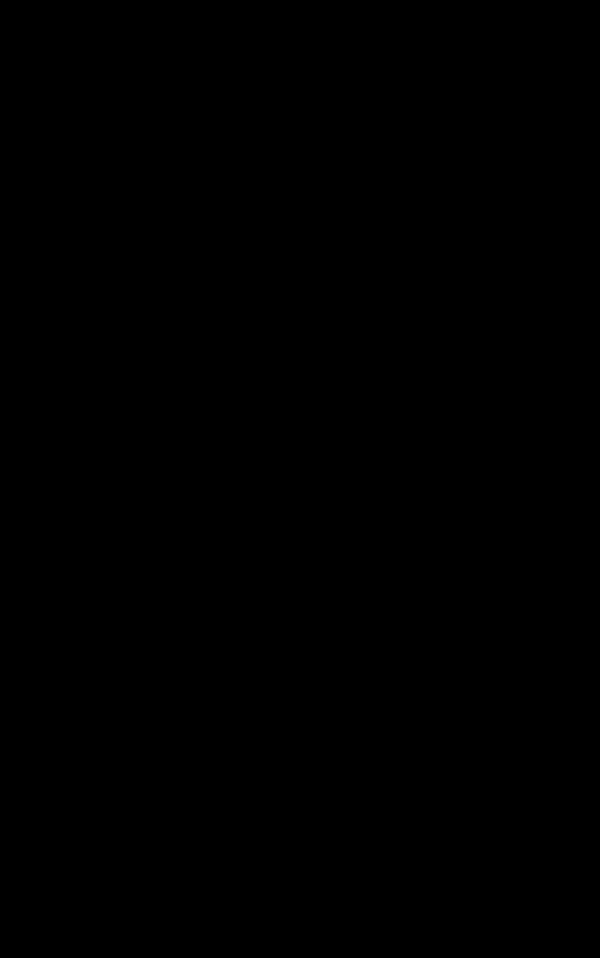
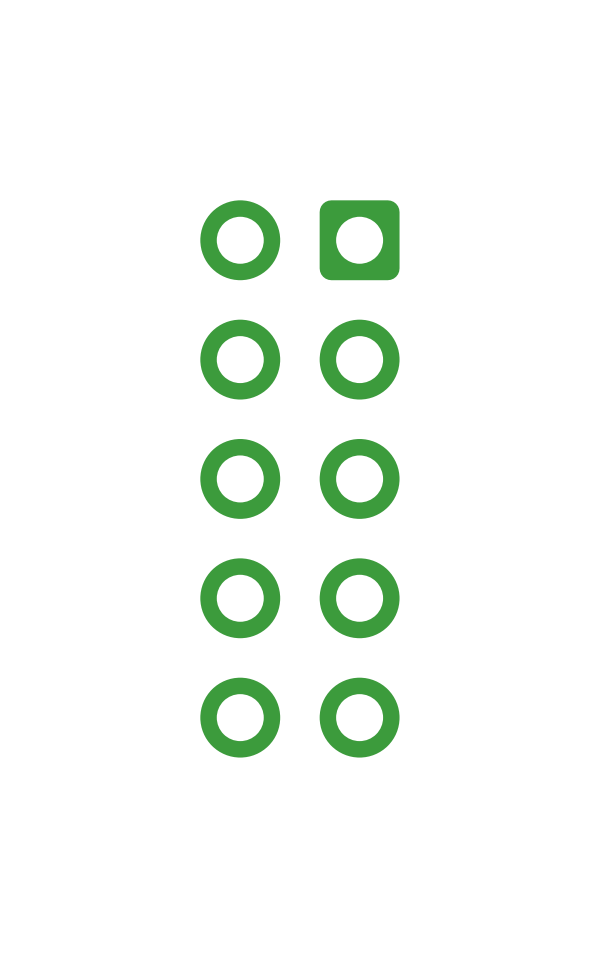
part: none -> (299, 478)

